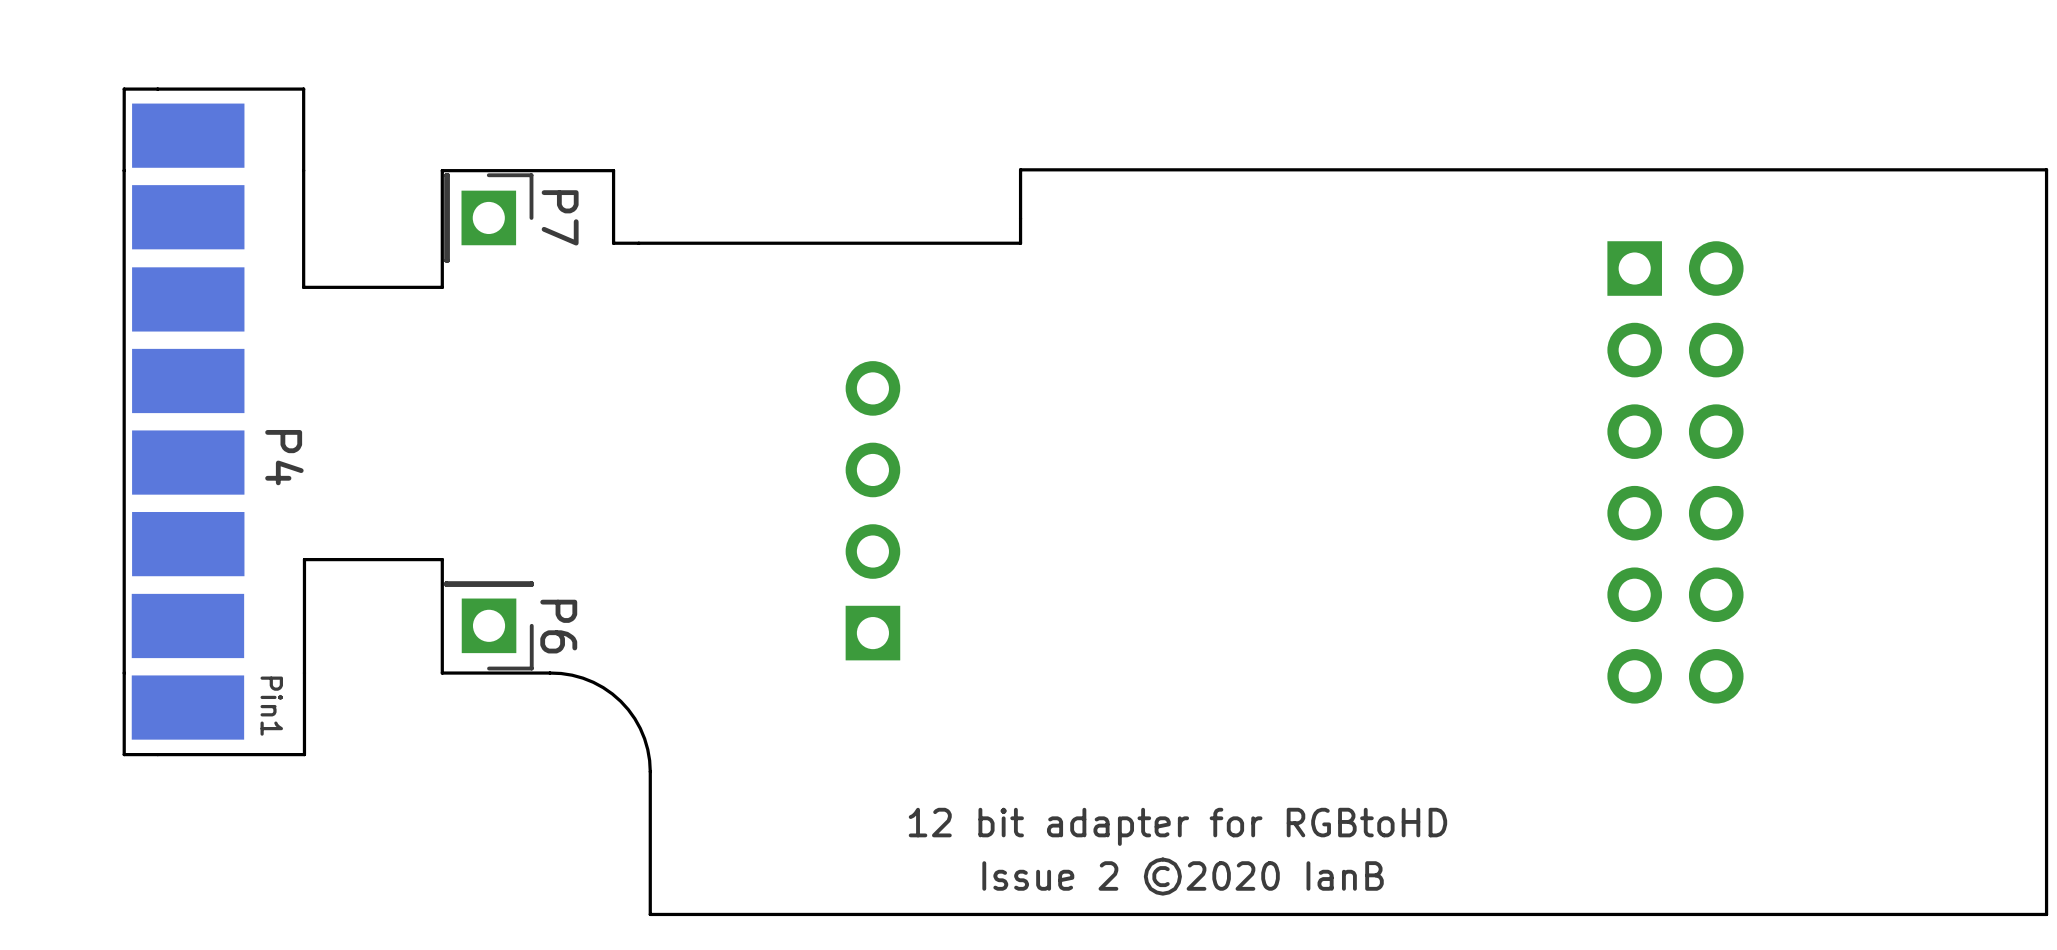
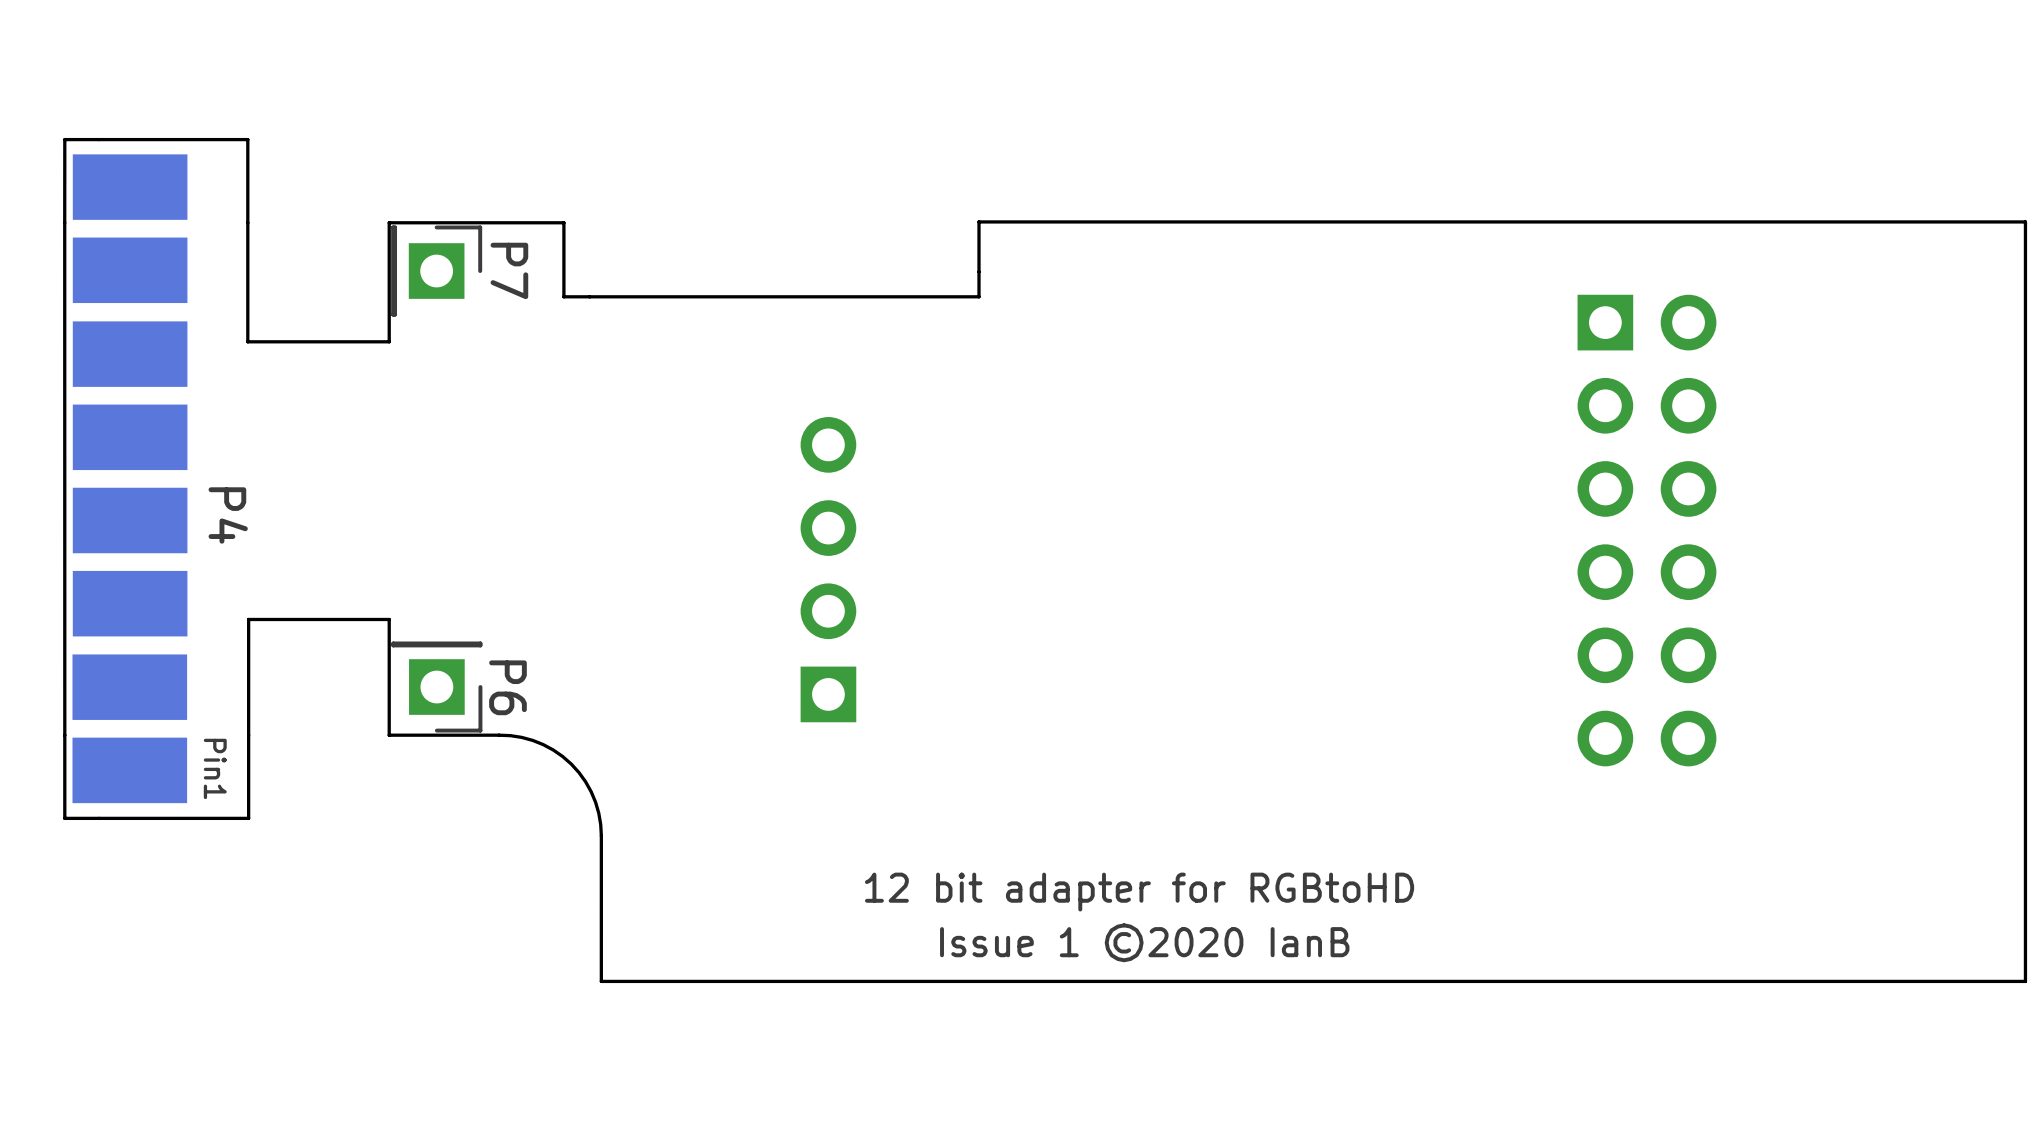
text: Issue 2 ©2020 IanB (1183, 876) -> Issue 1 ©2020 IanB (1144, 942)

